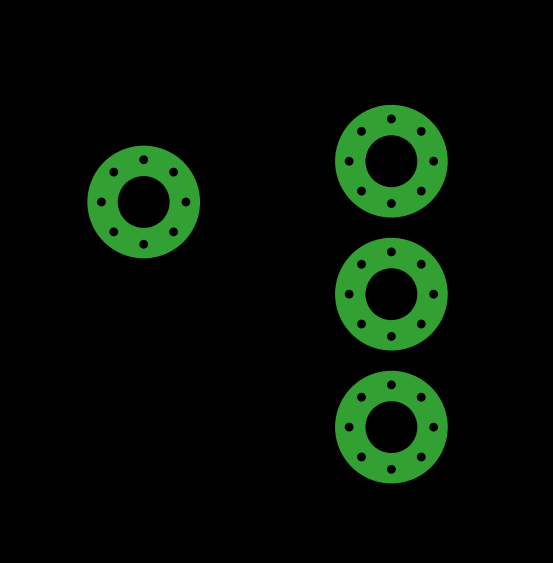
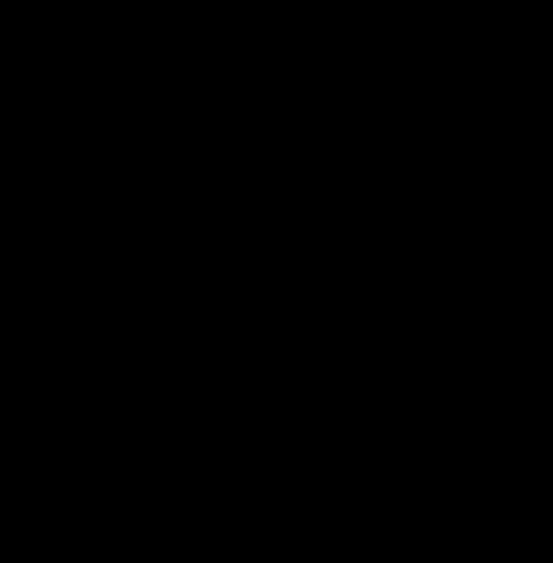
part: (391, 161) -> none
part: (143, 201) -> none
part: (391, 294) -> none
part: (391, 427) -> none

